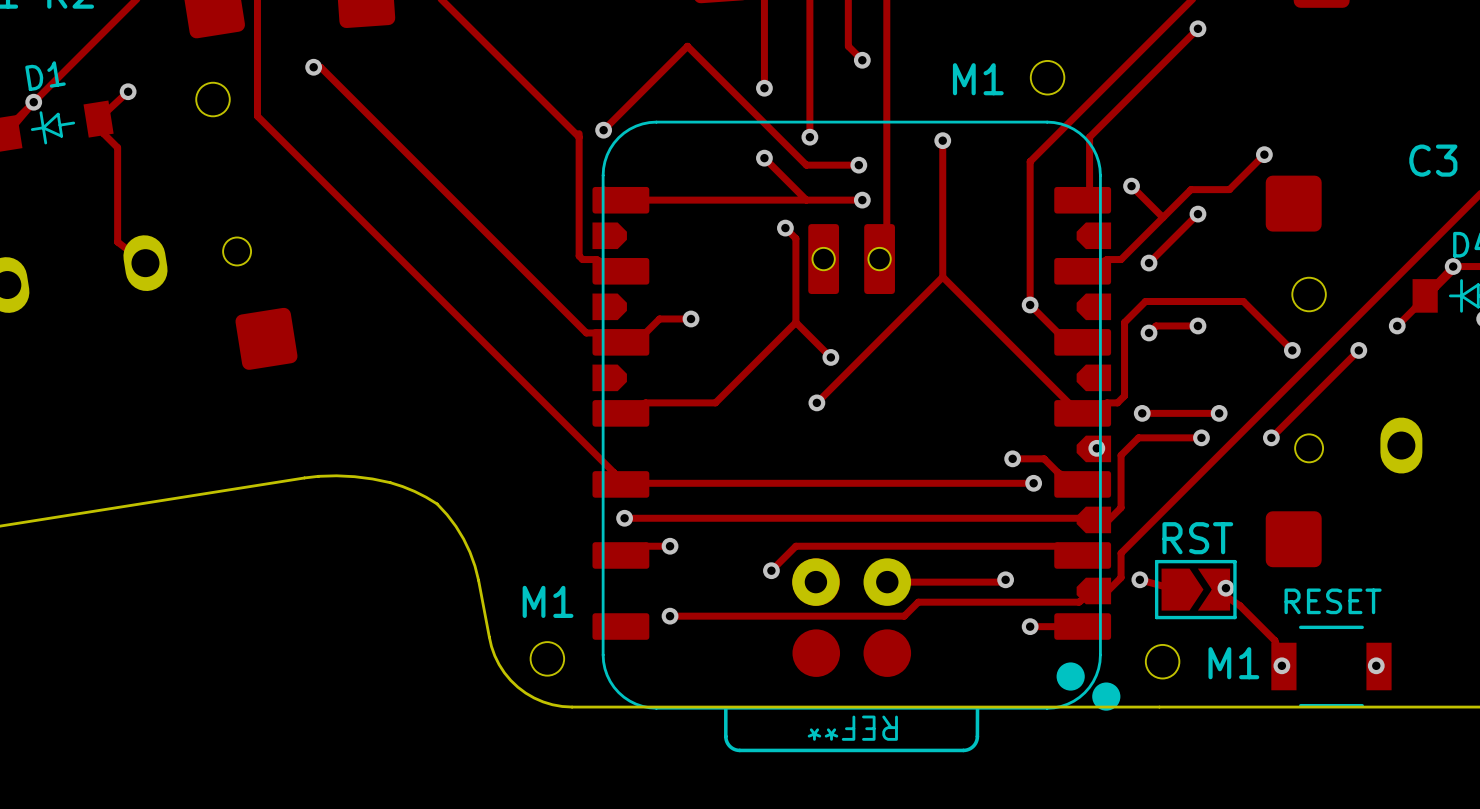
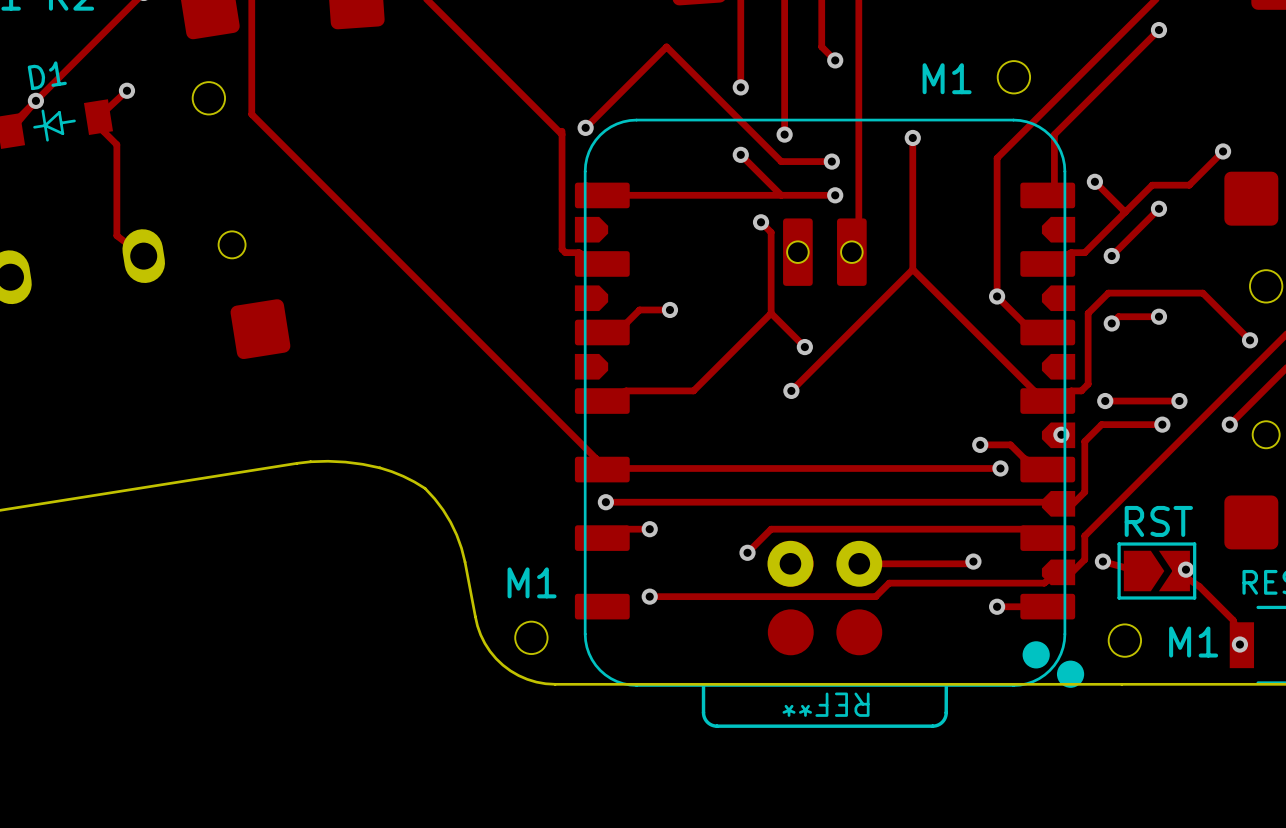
track: (313, 67) (320, 67) (586, 332) (596, 332) (620, 342) -> none
via: (313, 67) -> none

